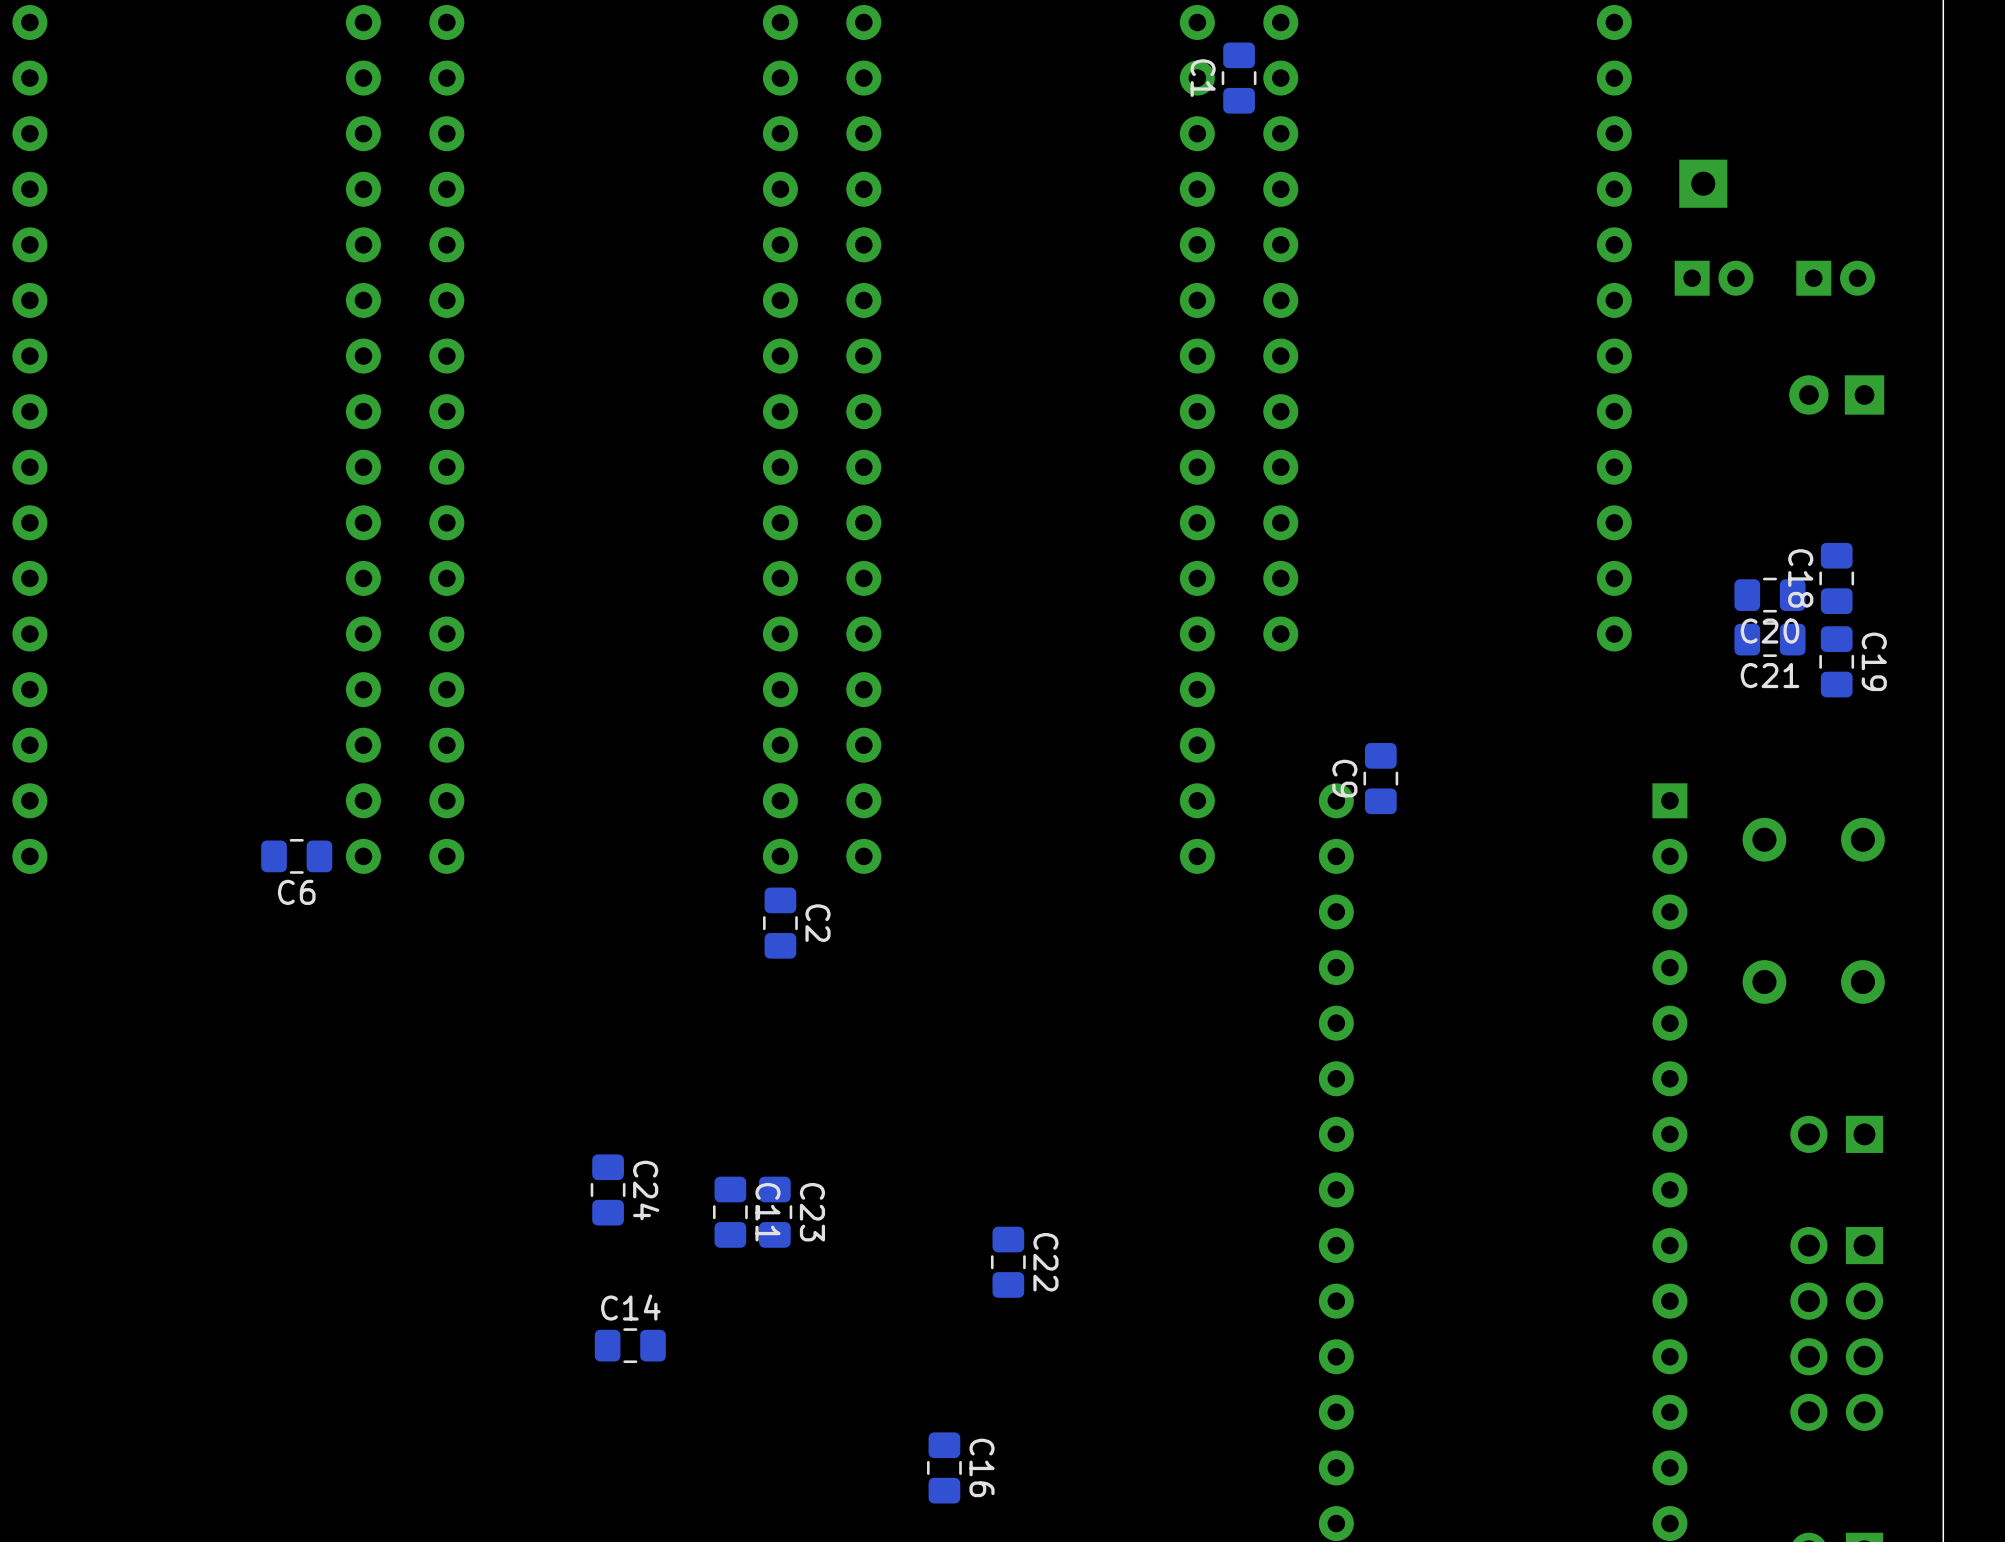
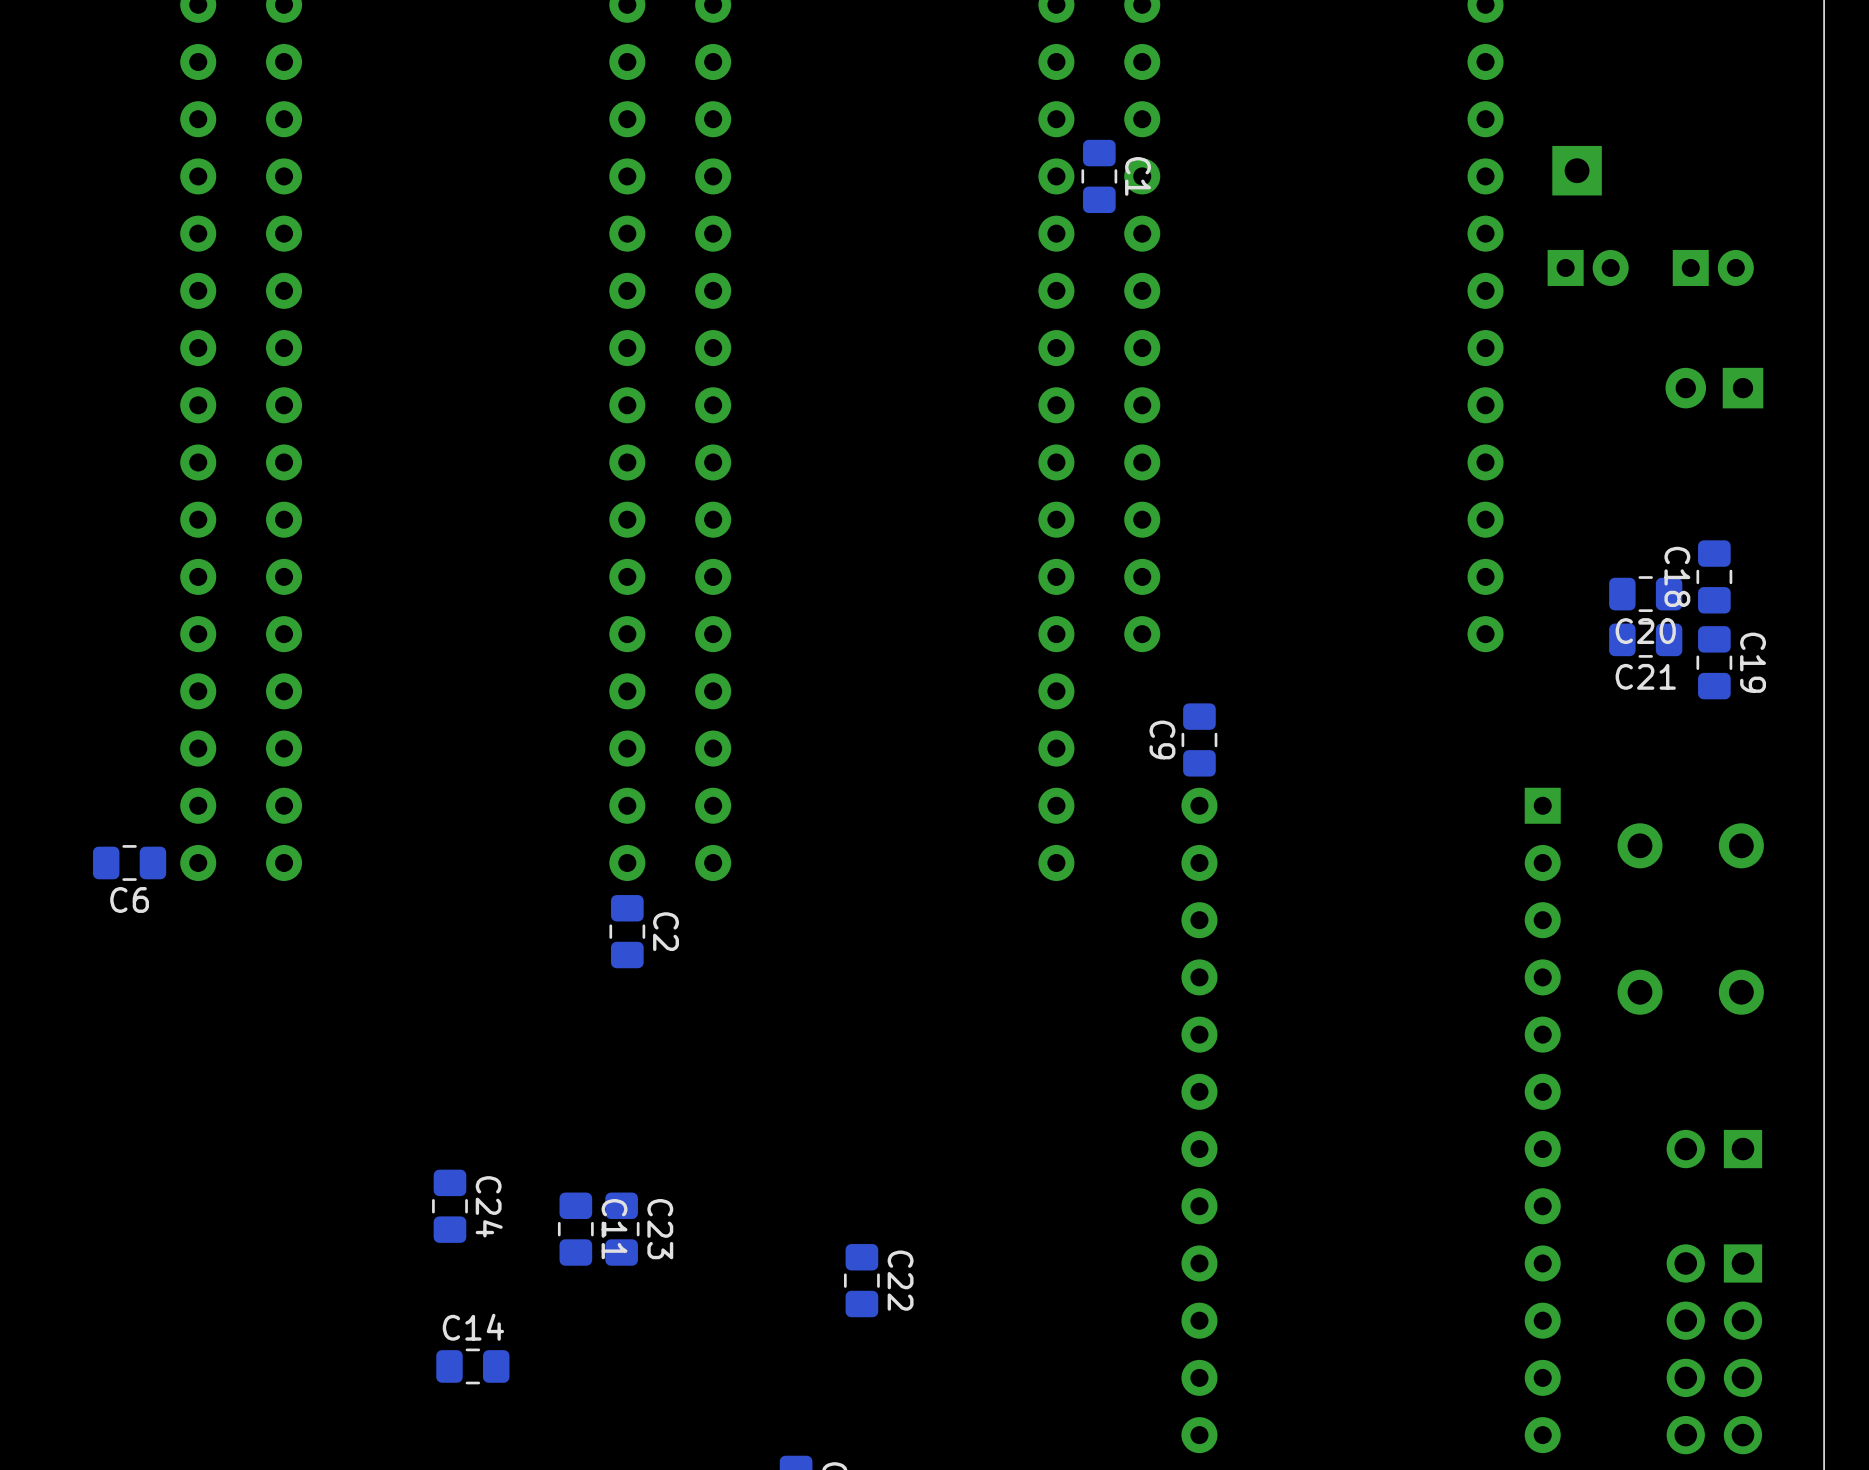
C1 name position: C1 (1203, 78) -> C1 (1138, 176)
C1 position: (1239, 78) -> (1099, 176)
C9 position: (1380, 778) -> (1199, 739)

